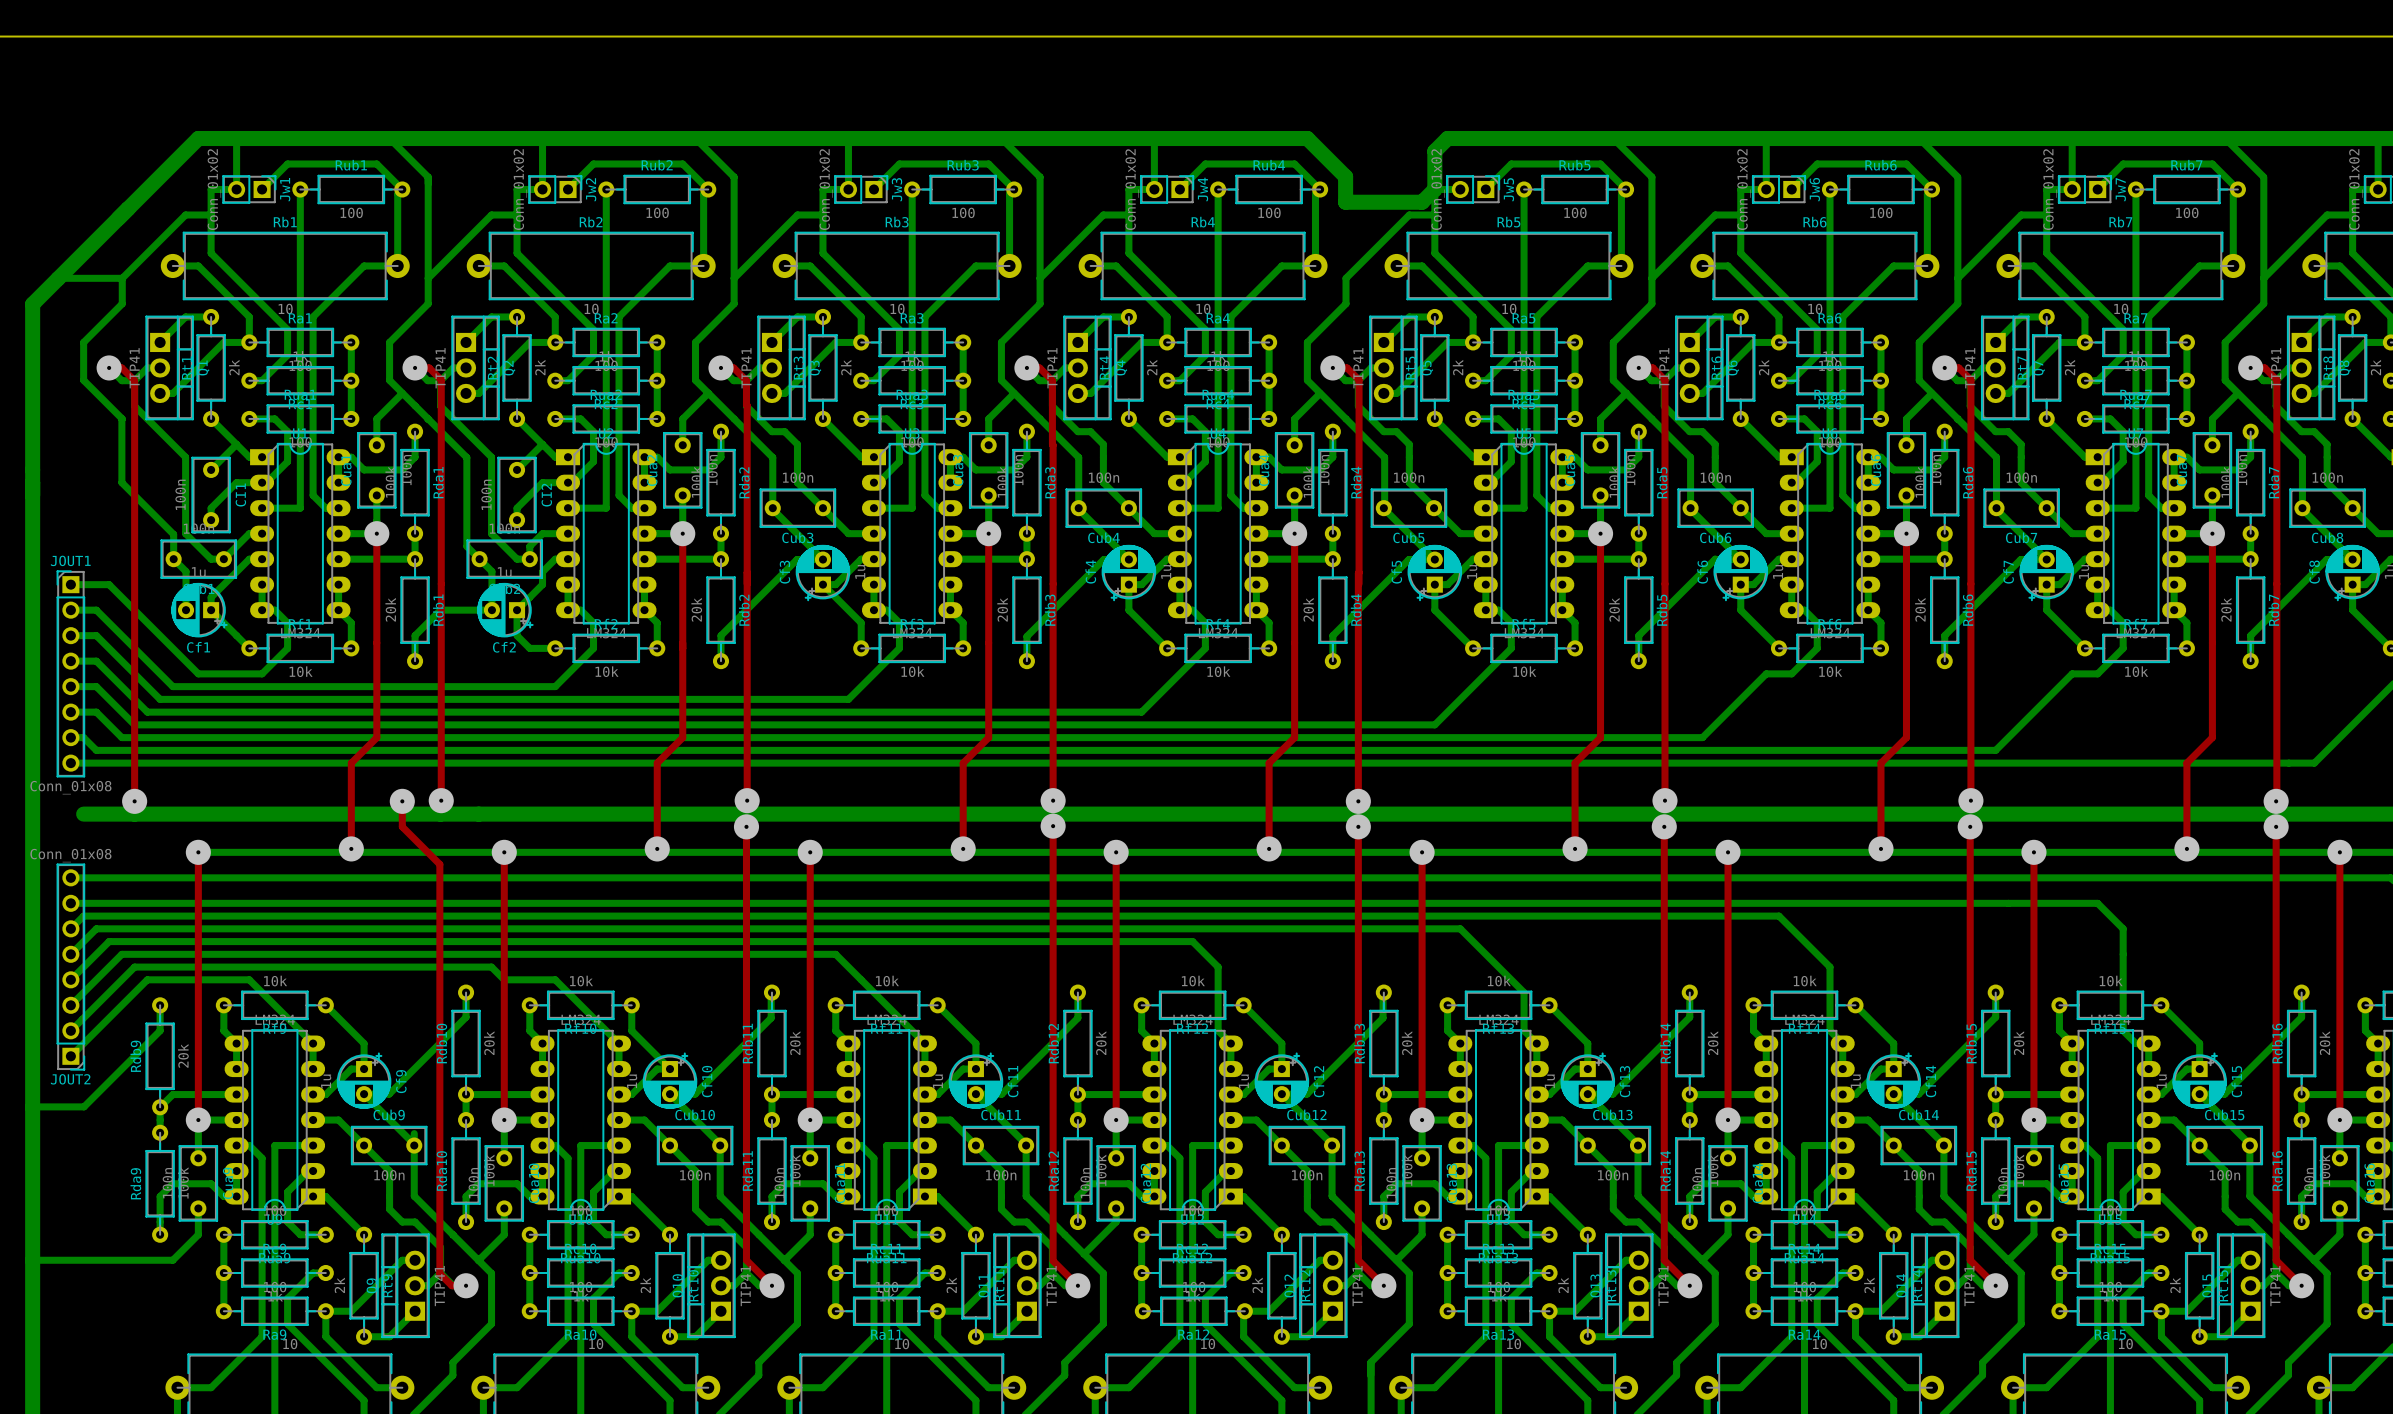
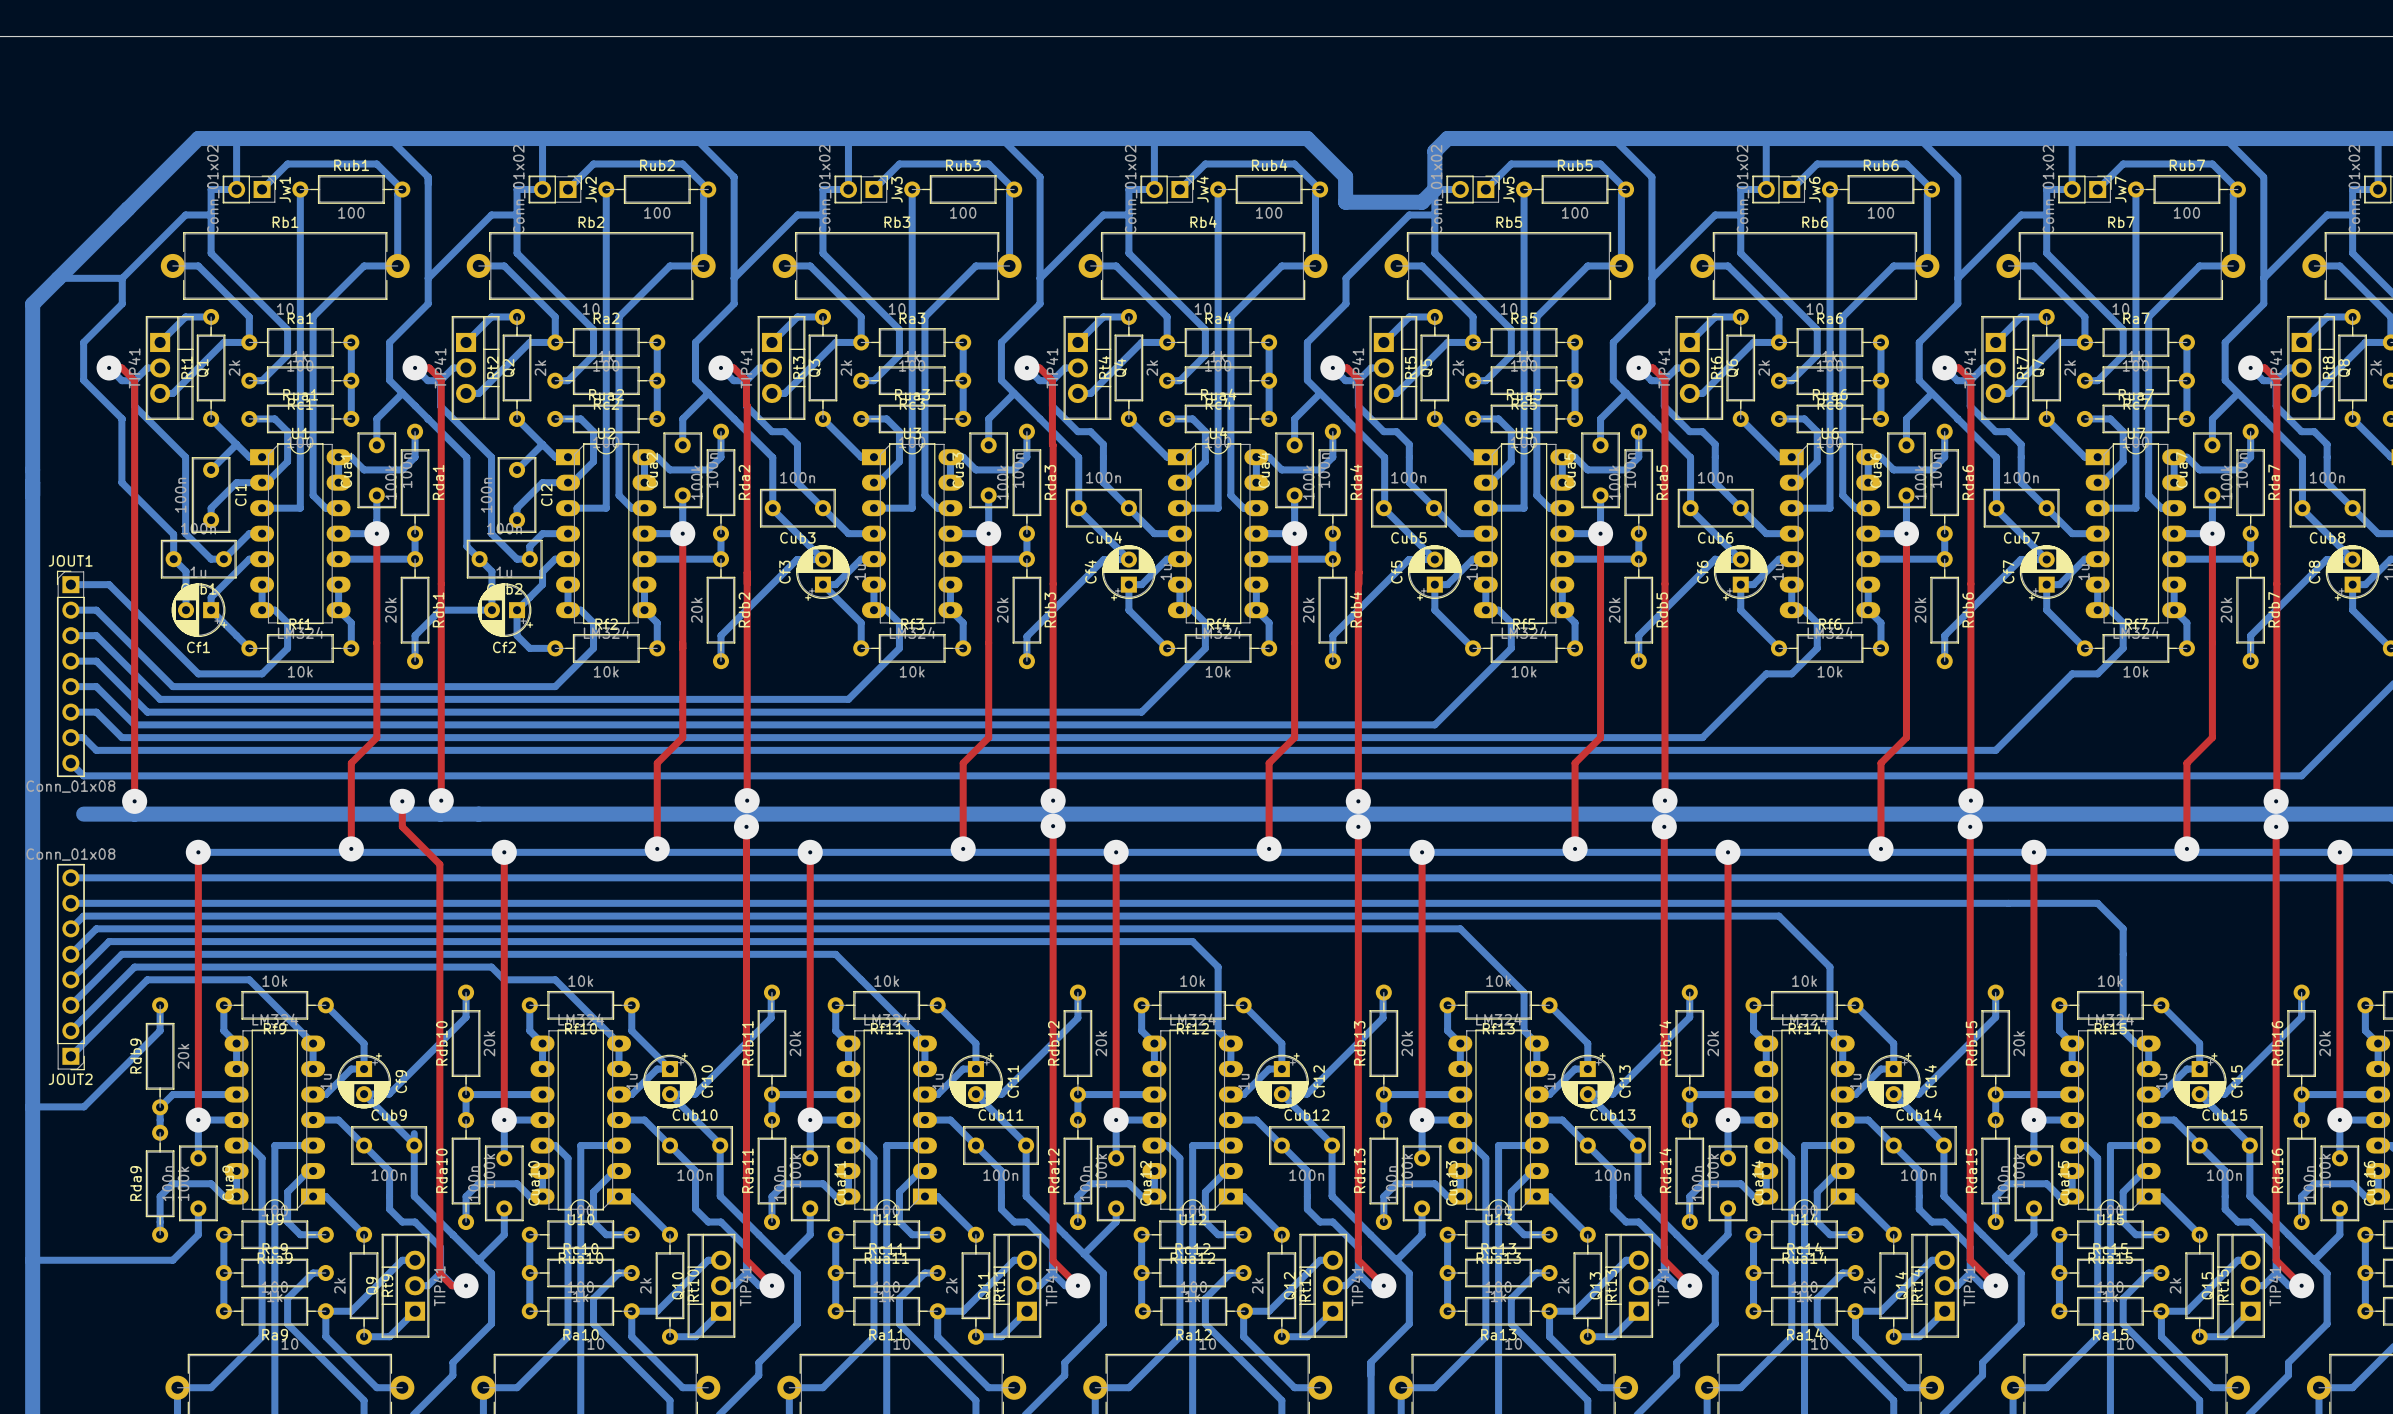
bottom track: (70, 763) (2314, 763) -> (70, 763) (83, 775) (2301, 775) (2314, 763)

